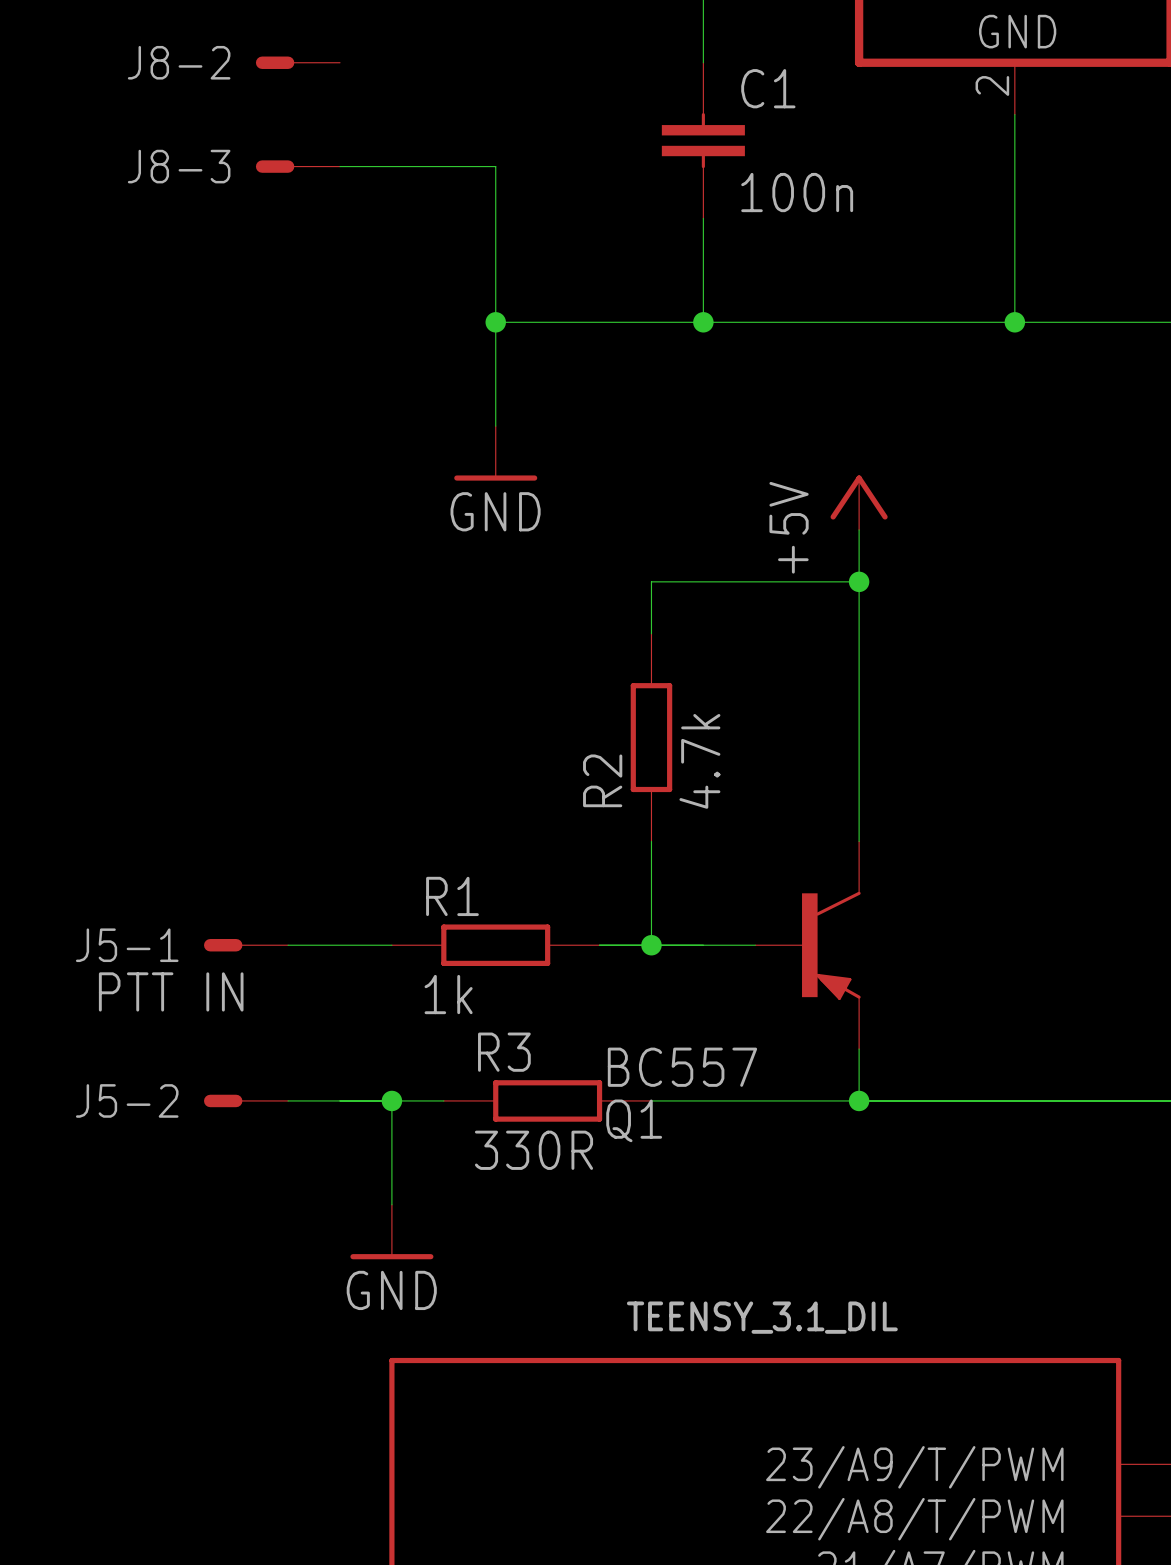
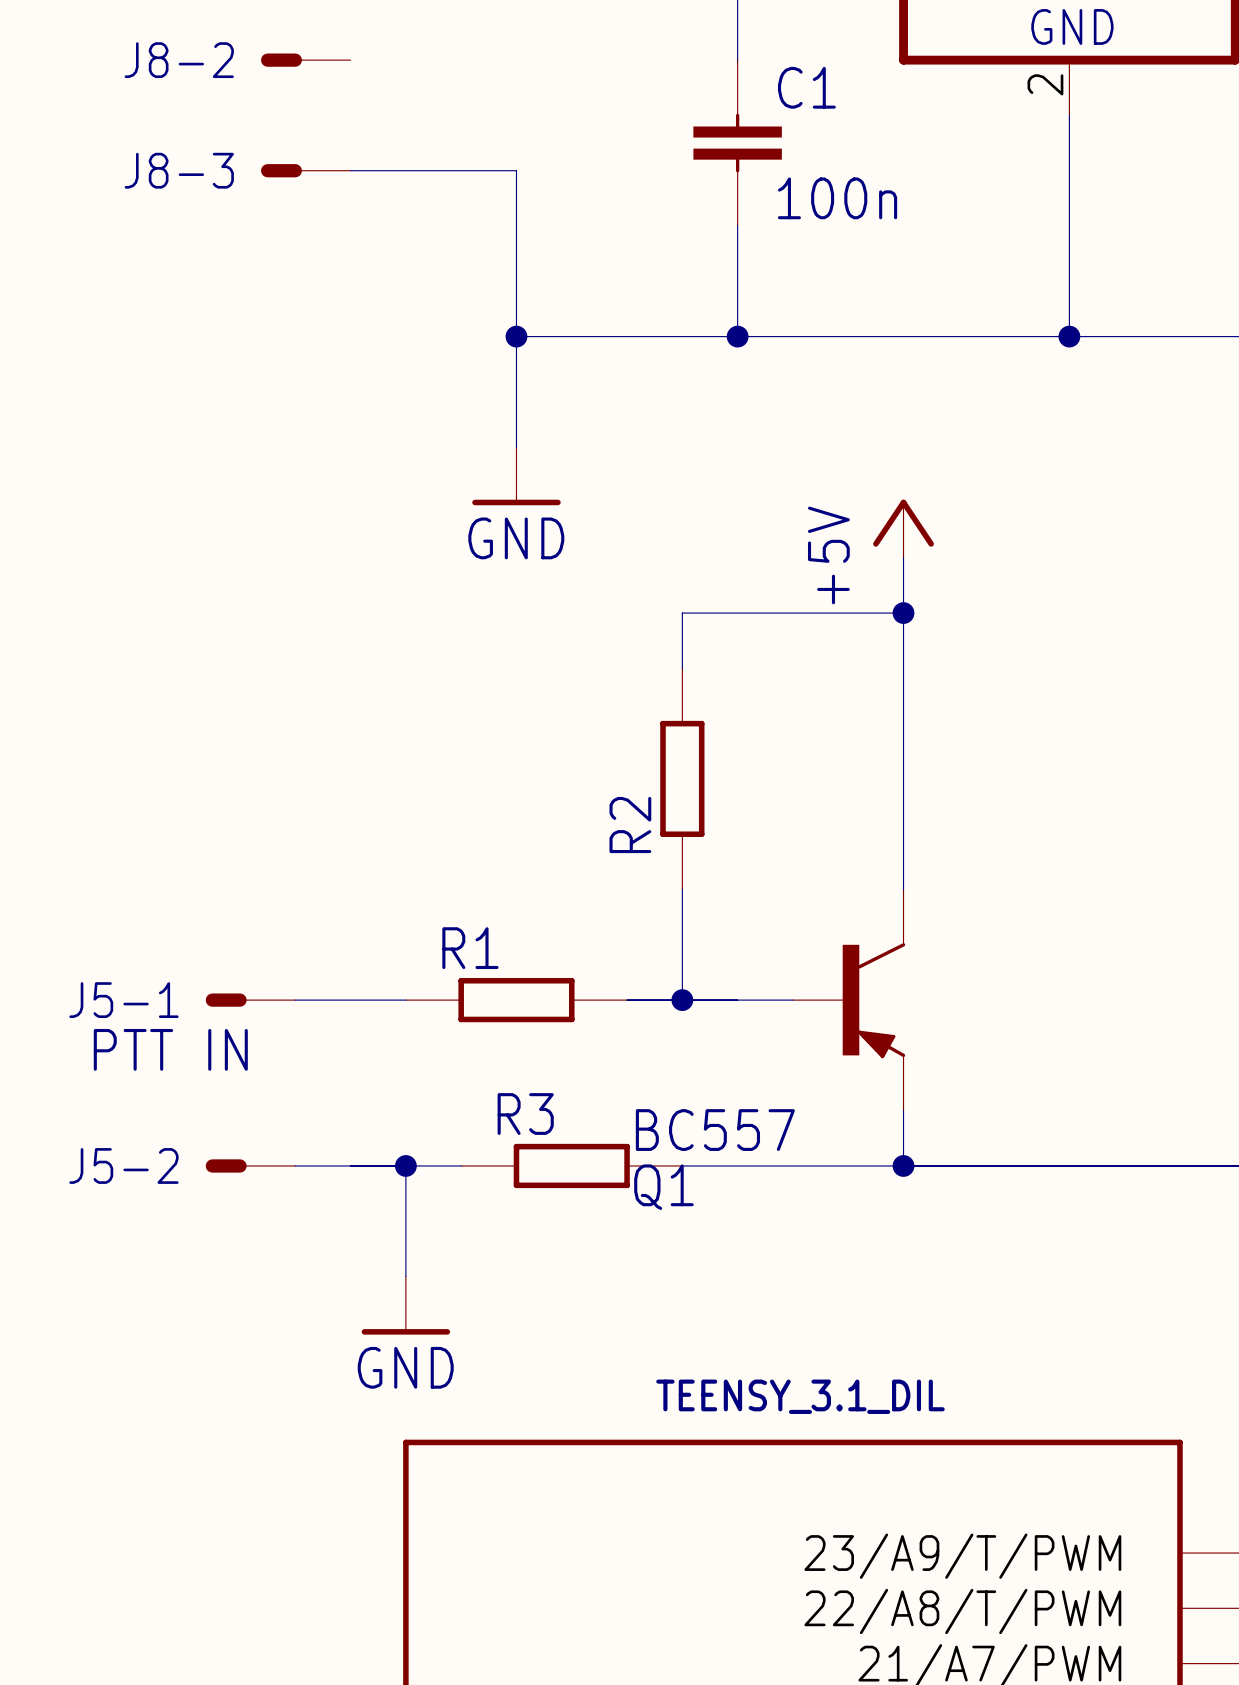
R2 value: 4.7k (699, 761) -> none
R1 value: 1k (448, 994) -> none
R3 value: 330R (533, 1150) -> none

